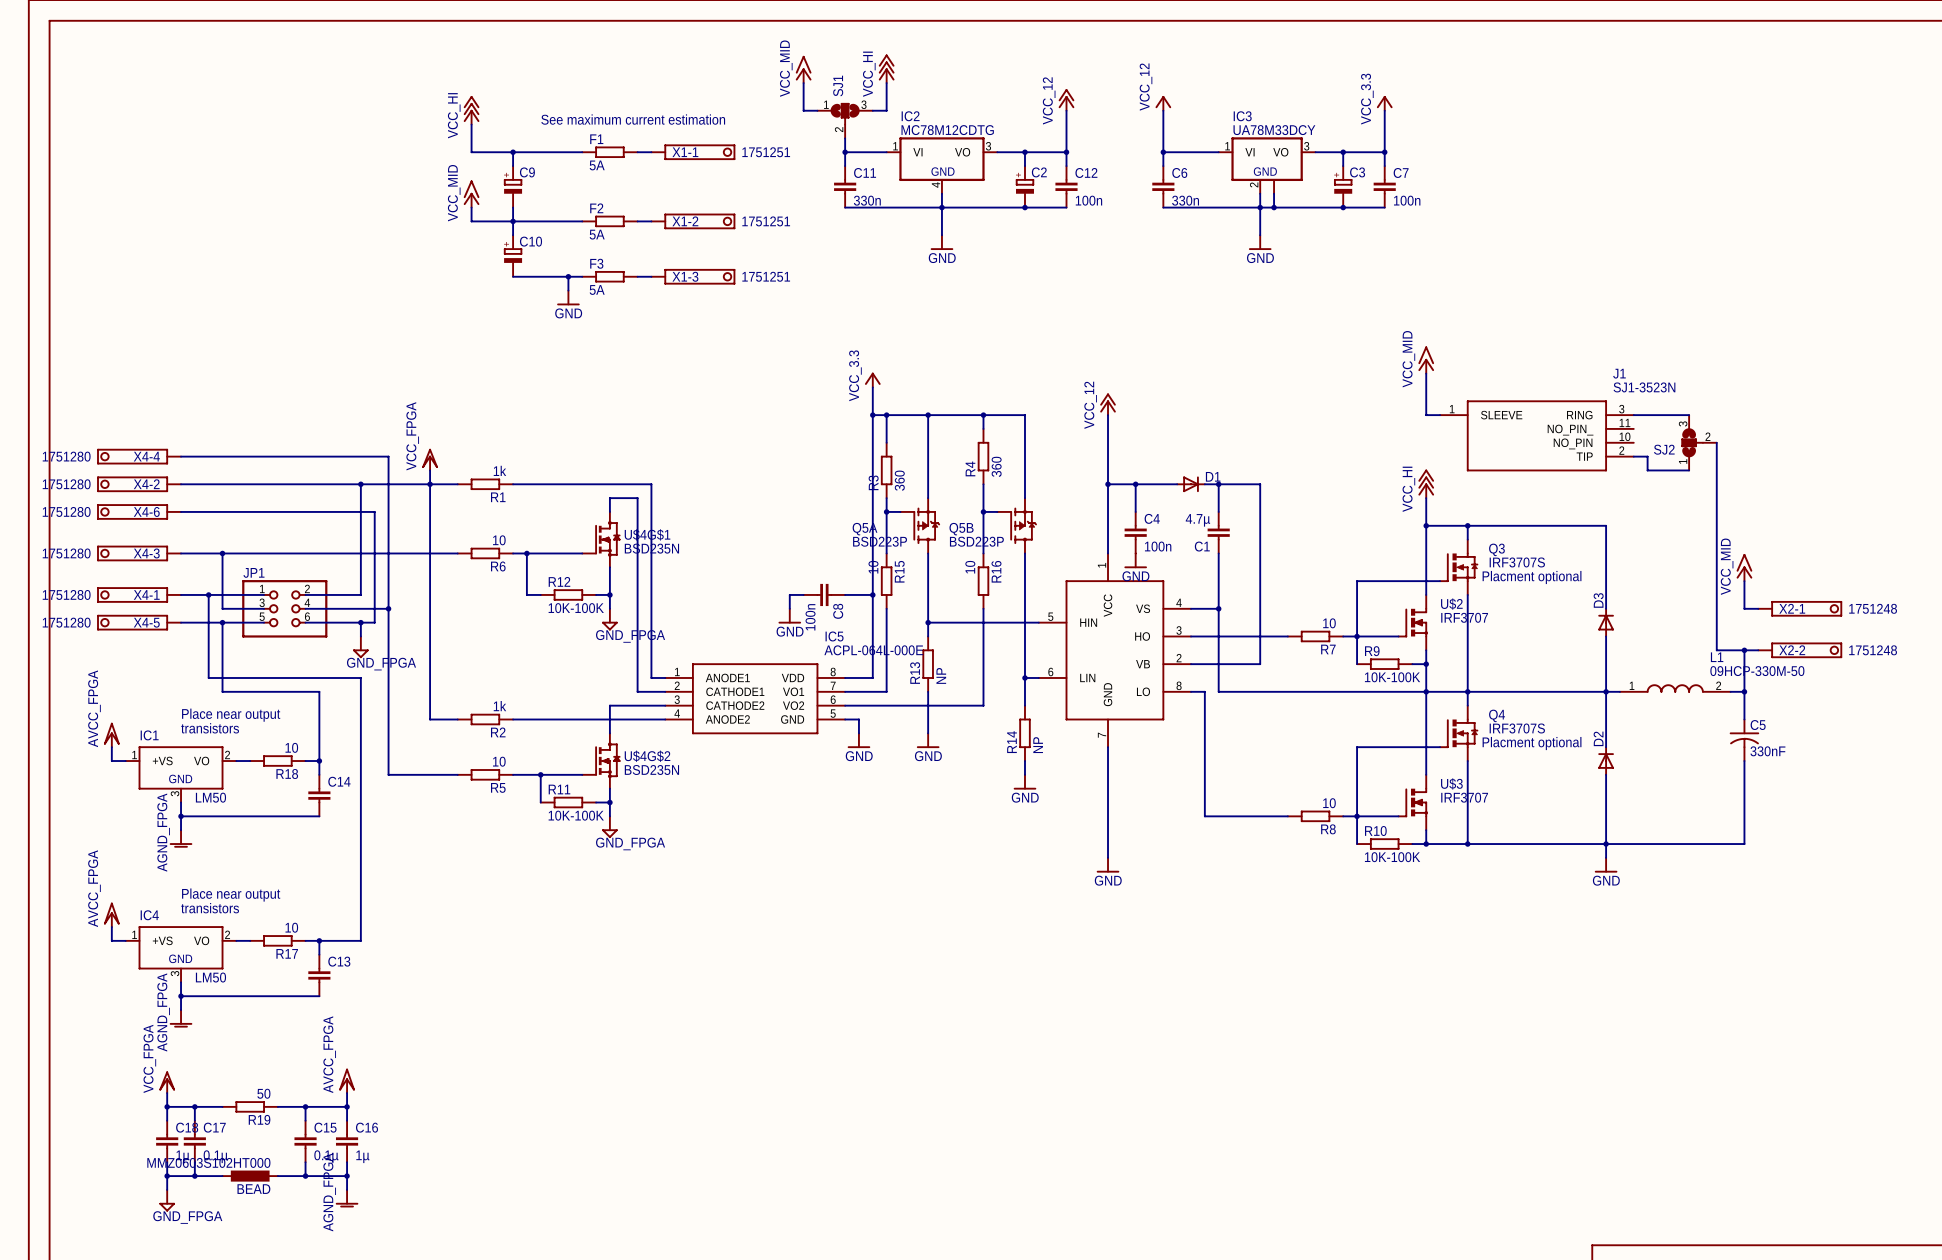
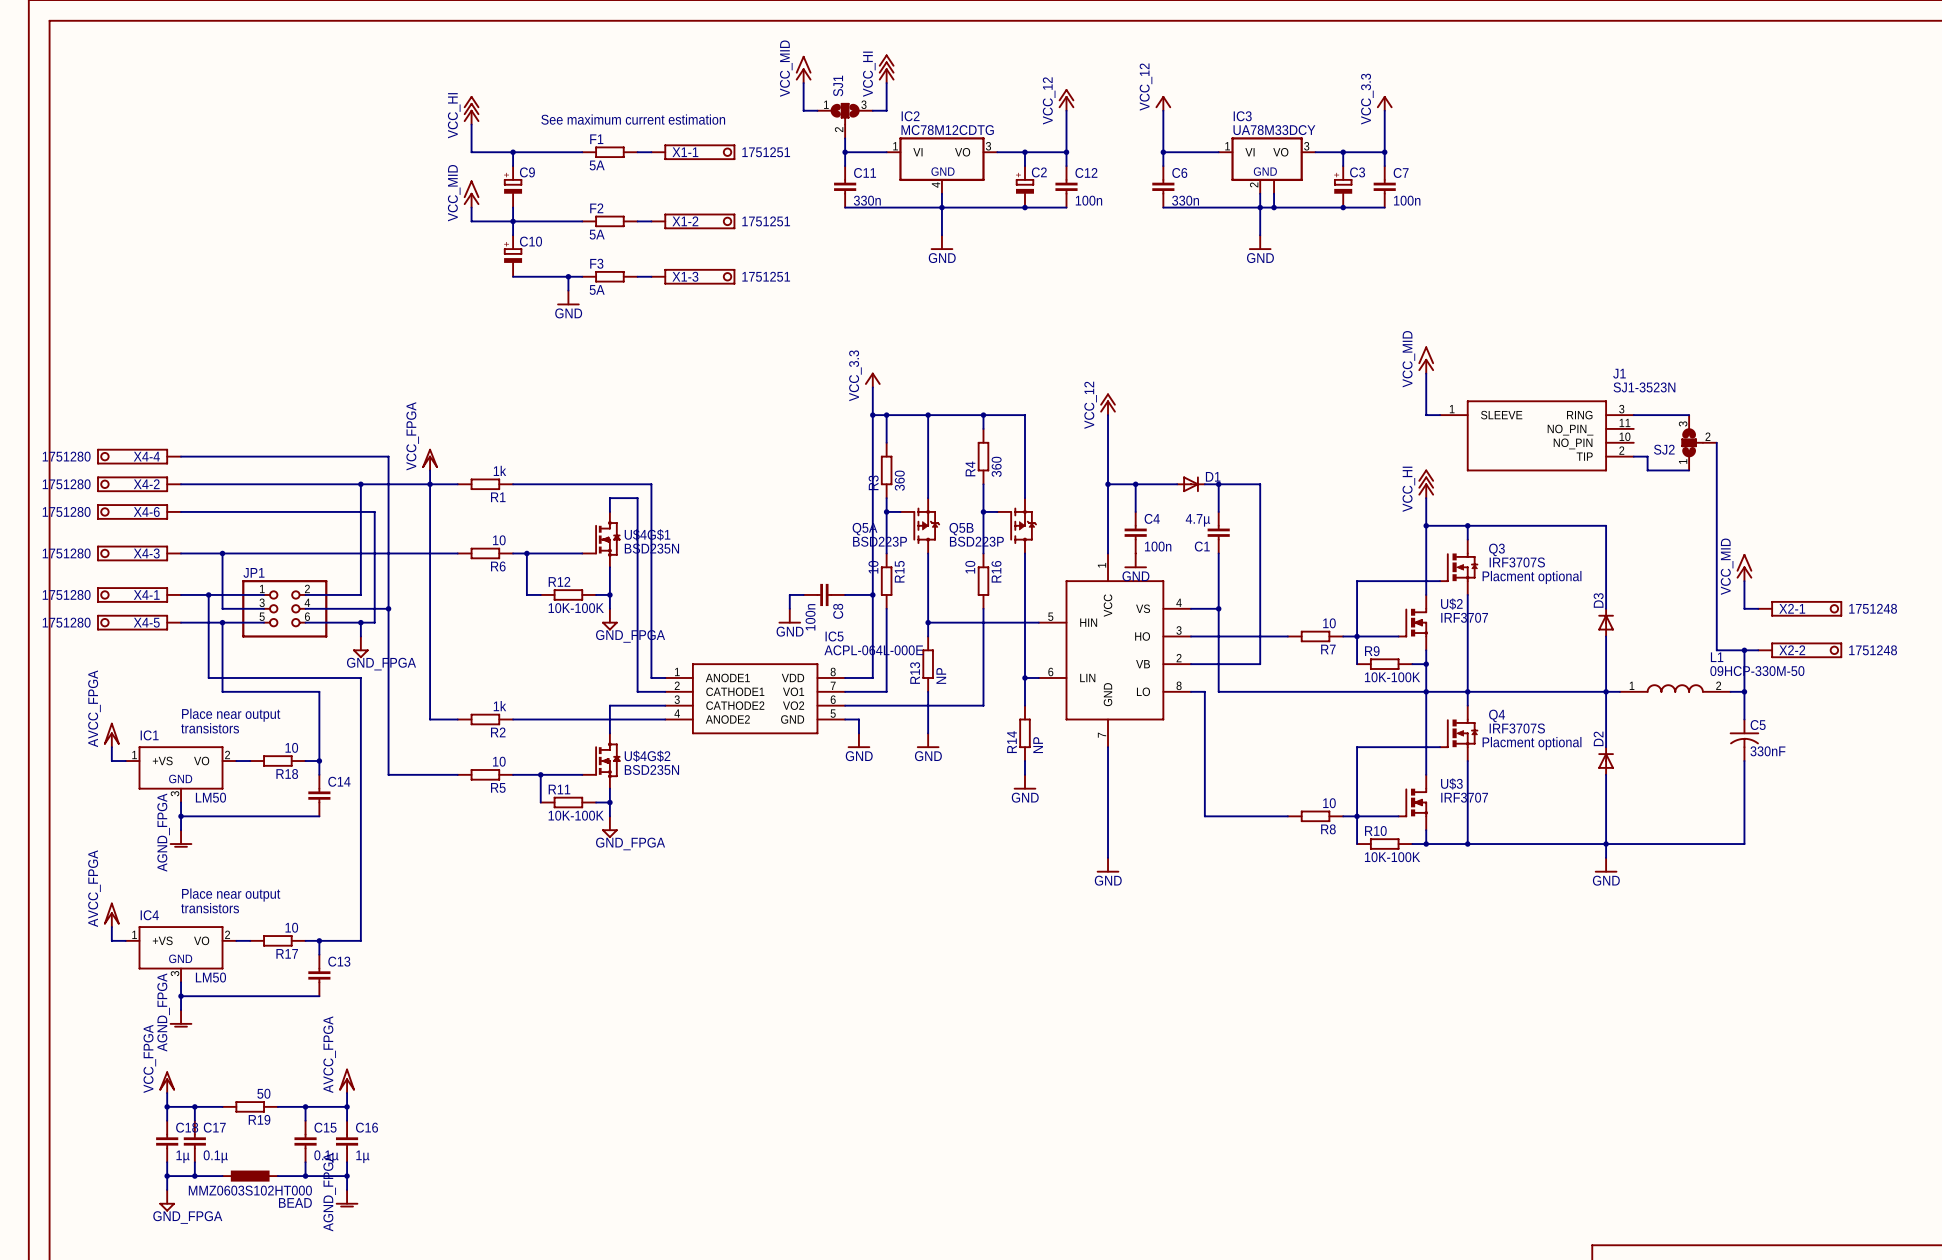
BEAD value position: MMZ0603S102HT000 (208, 1162) -> MMZ0603S102HT000 (250, 1190)
BEAD name position: BEAD (253, 1189) -> BEAD (295, 1202)

